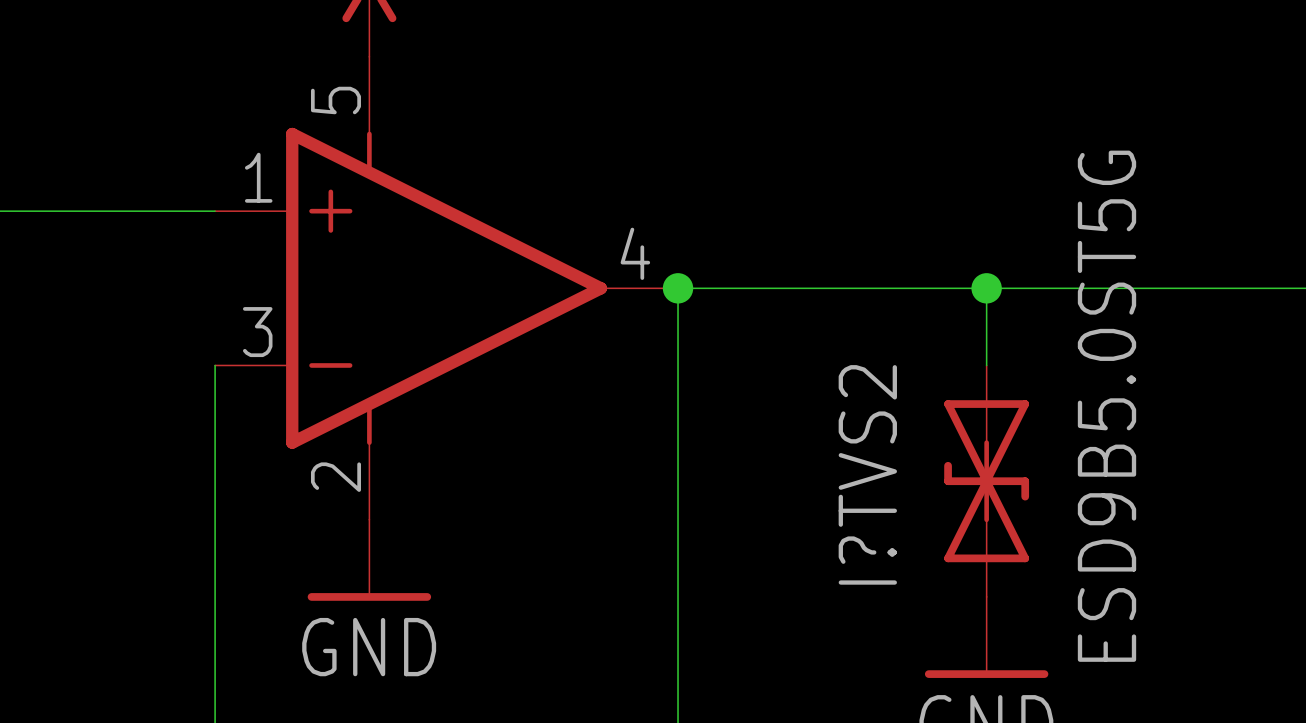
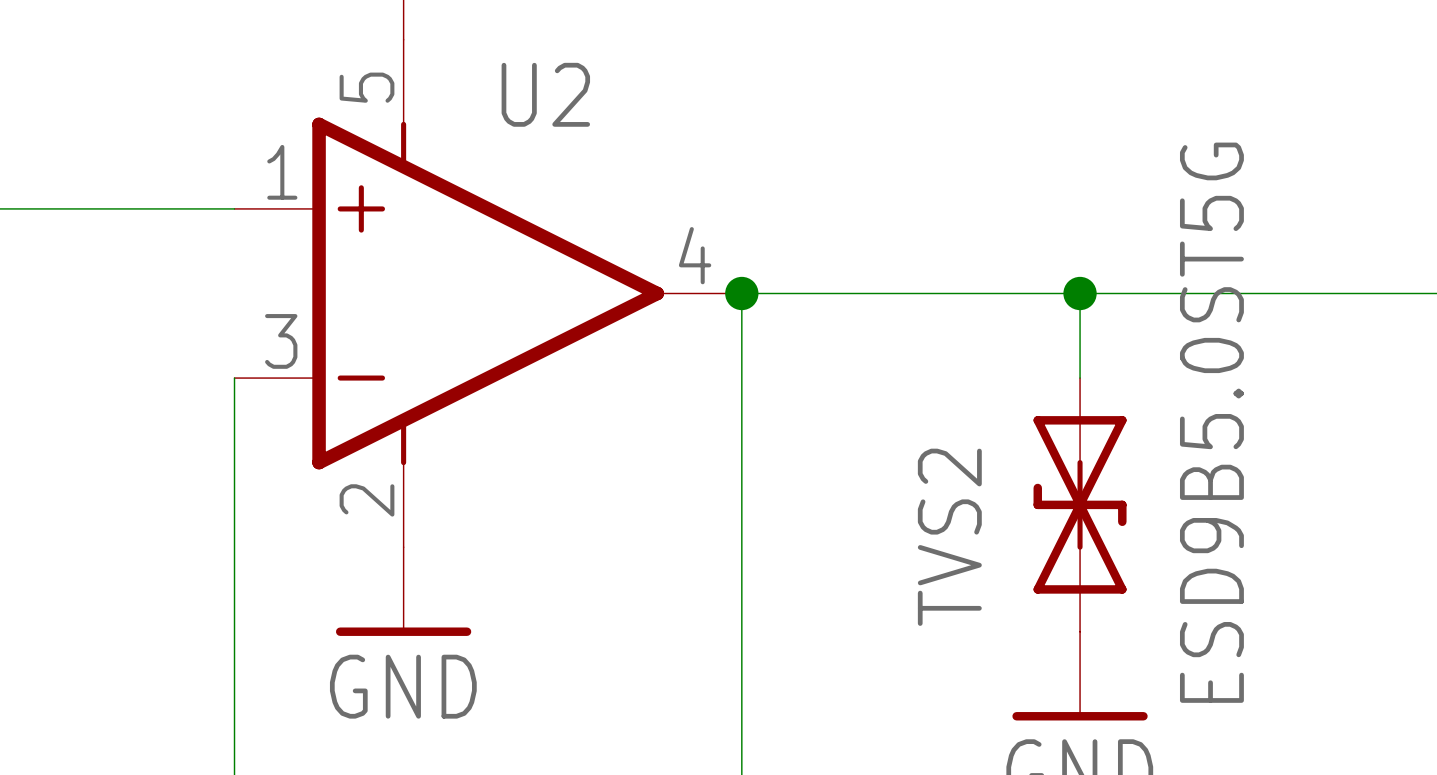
U2 name: none -> U2 (545, 94)
I?TVS2 name: I?TVS2 (867, 474) -> TVS2 (949, 537)

